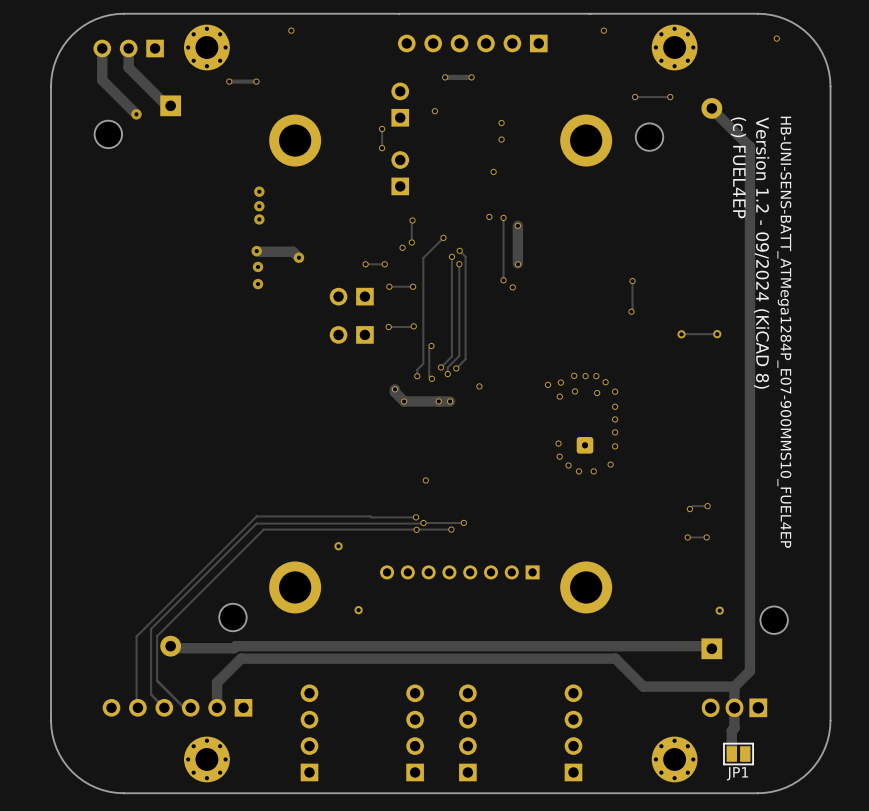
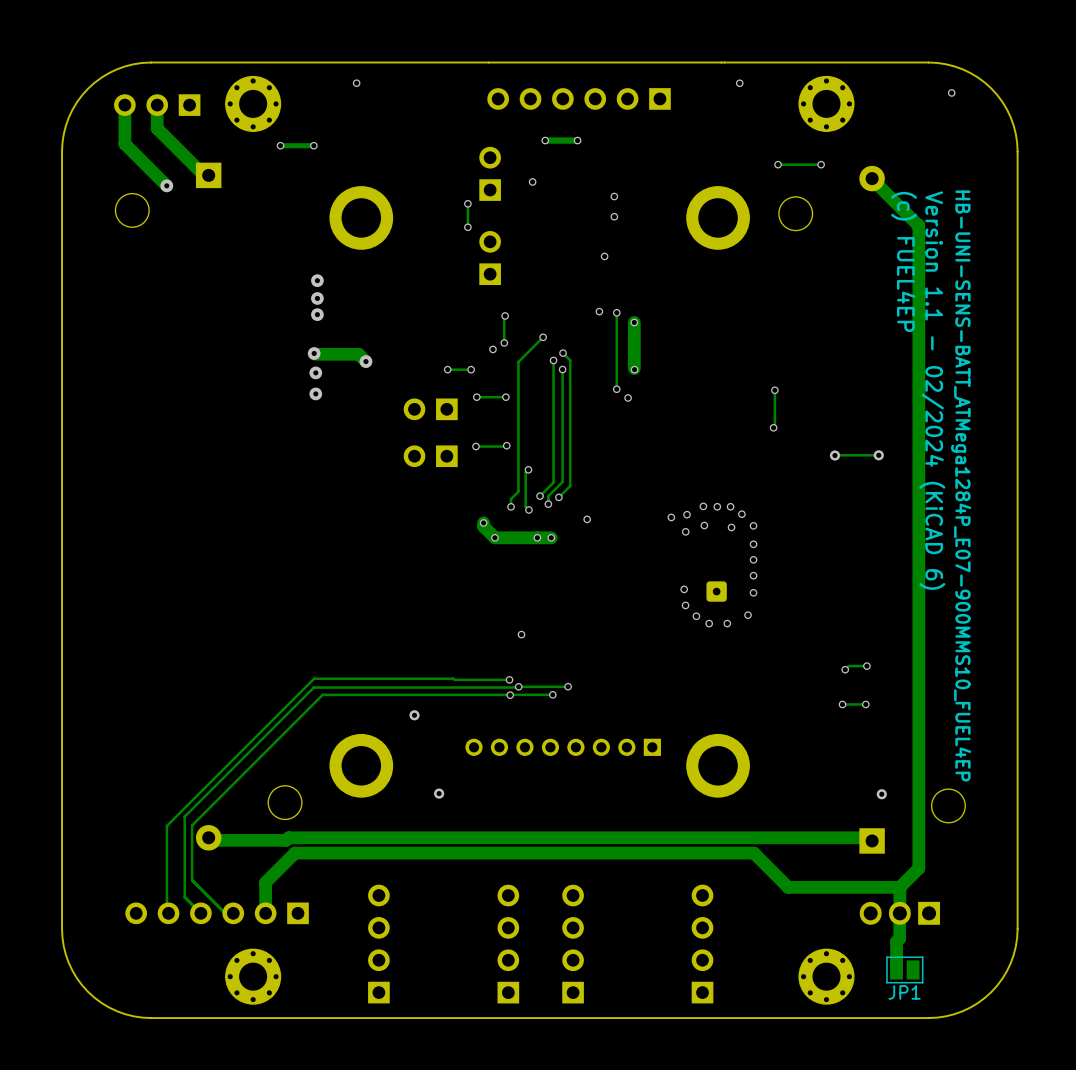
text: Version 1.2 - 09/2024 (KiCAD 8) (761, 253) -> Version 1.1 - 02/2024 (KiCAD 6) (932, 390)

